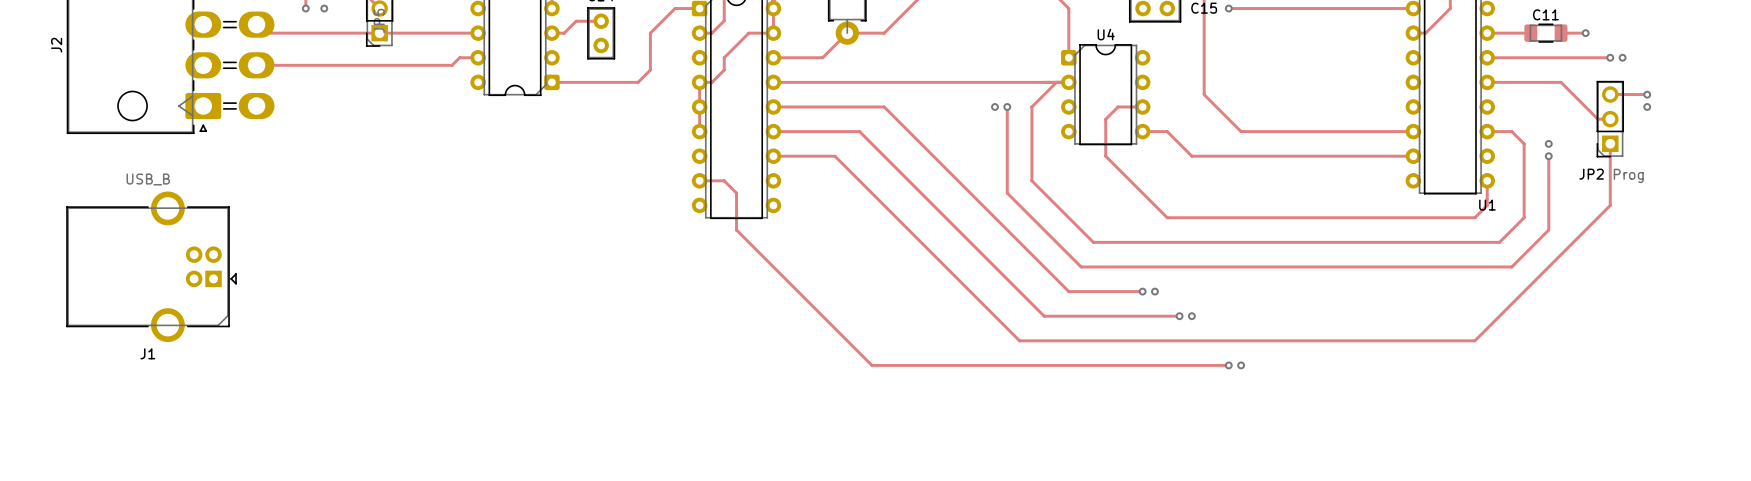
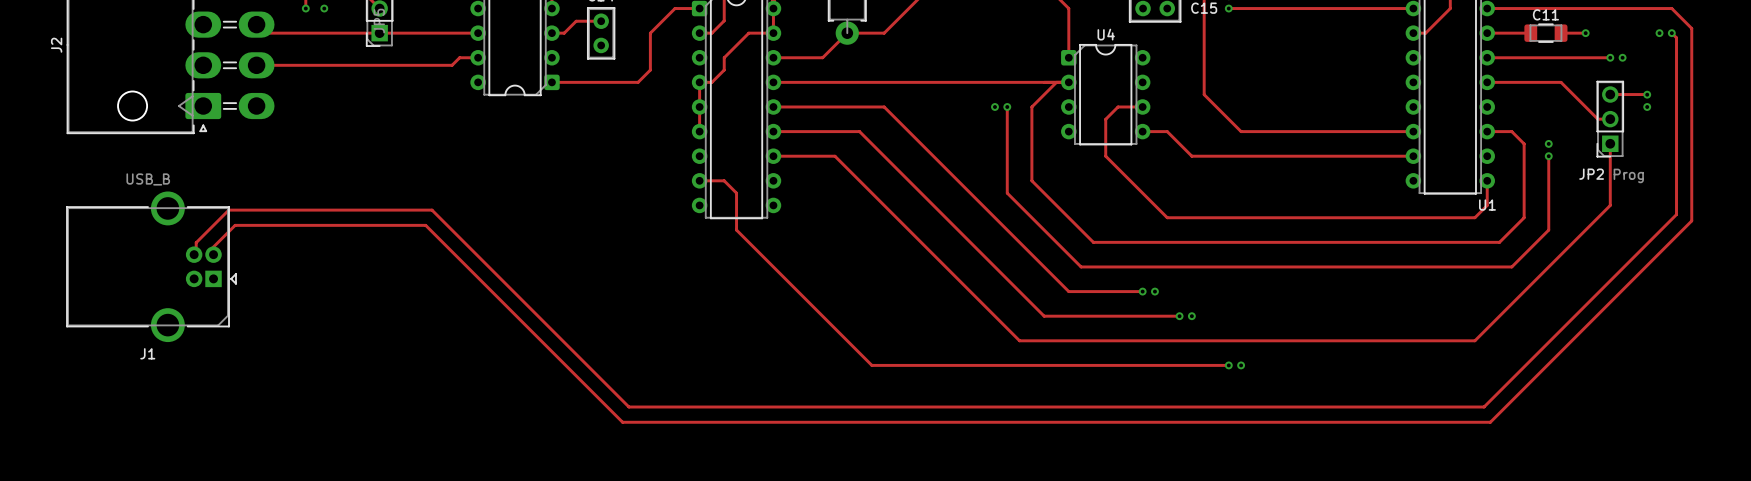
track: none -> (1487, 8) (1671, 8) (1691, 28) (1691, 220) (1490, 422) (622, 422) (425, 225) (235, 225) (211, 249) (213, 254)
via: none -> (1659, 33)
track: none -> (1671, 33) (1676, 37) (1676, 214) (1484, 407) (628, 407) (432, 210) (228, 210) (196, 242) (196, 252) (194, 254)
via: none -> (1671, 33)

